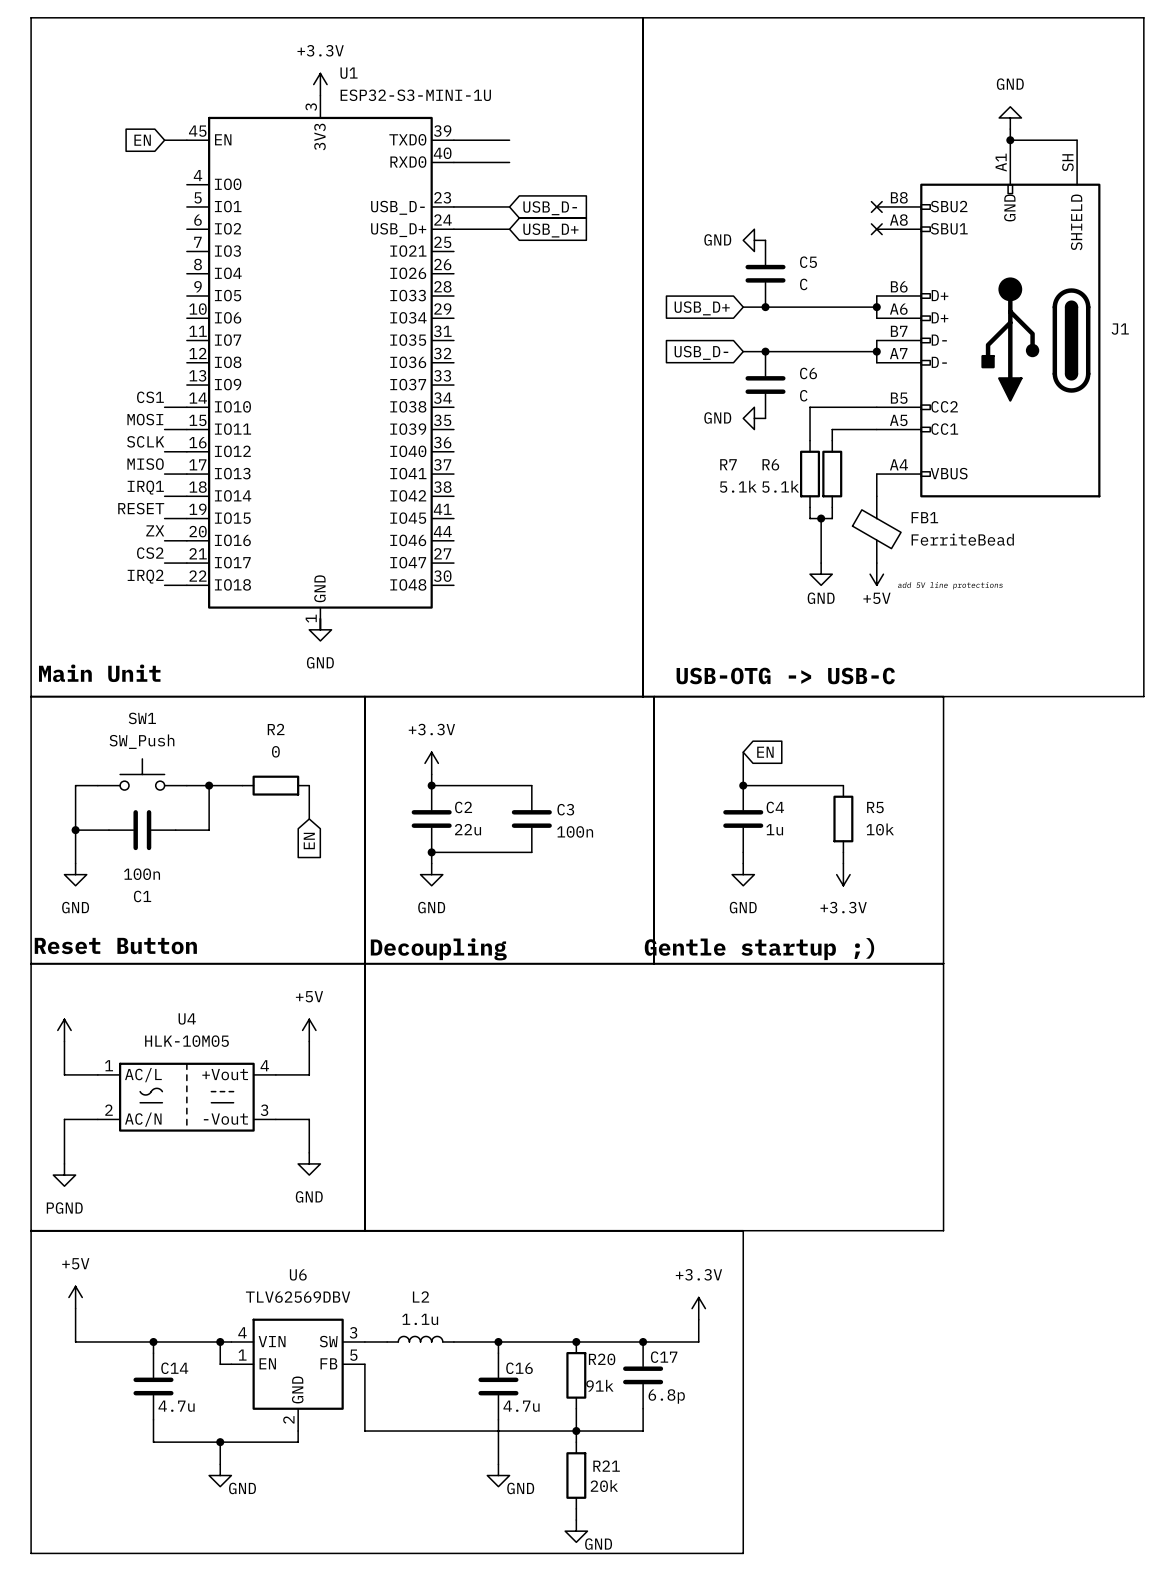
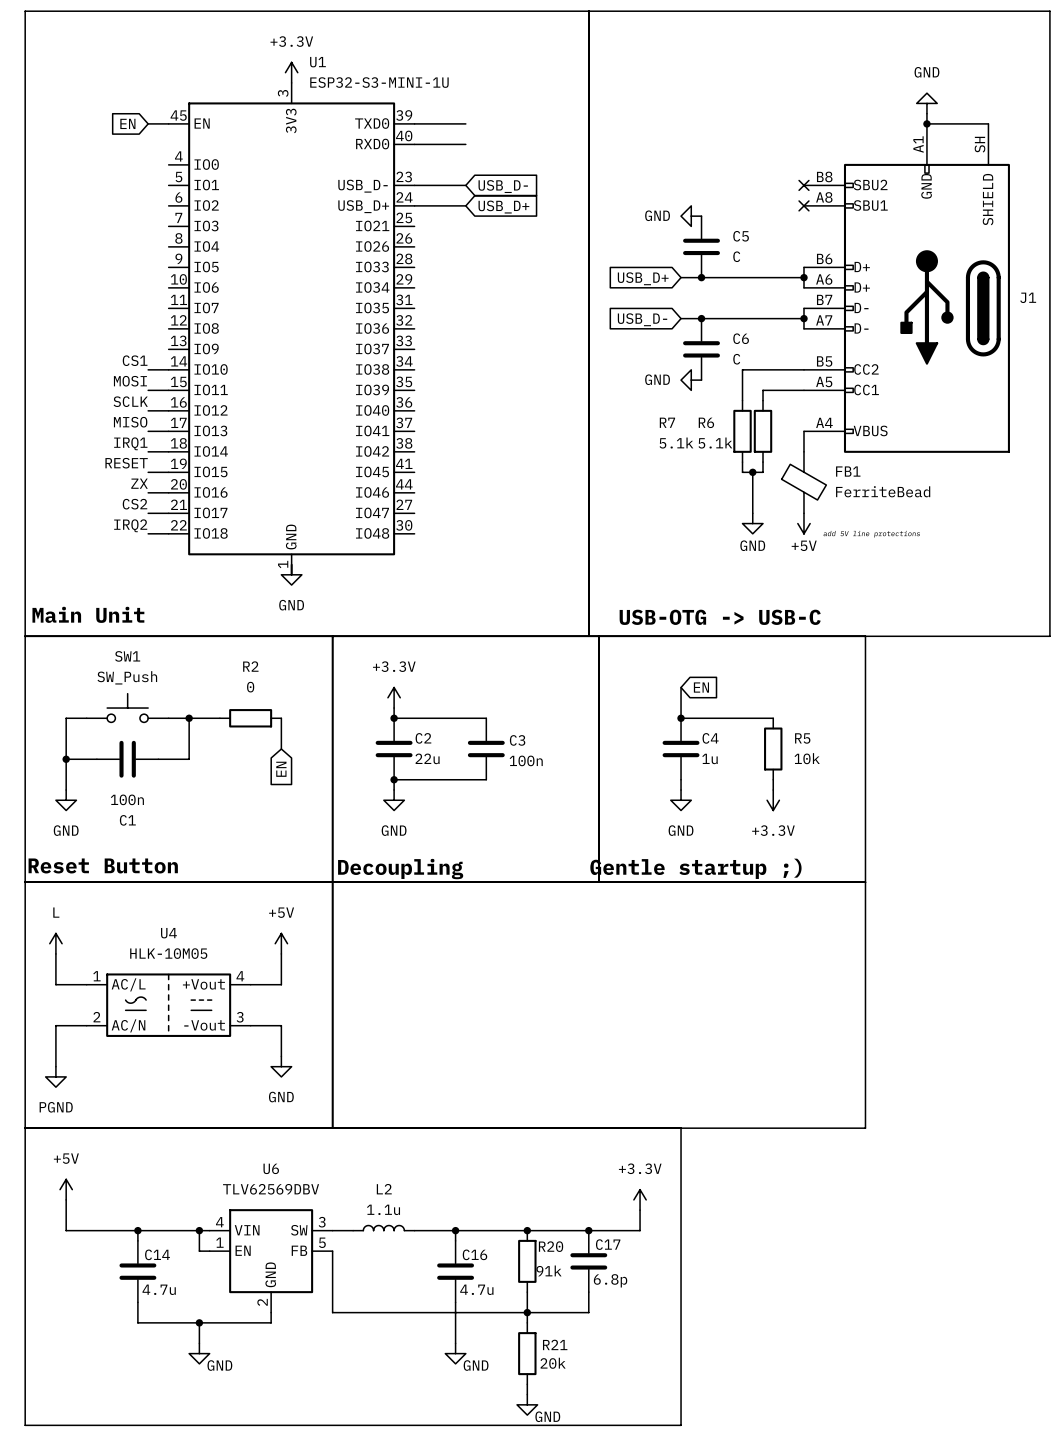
power symbol text: none -> L (56, 912)

